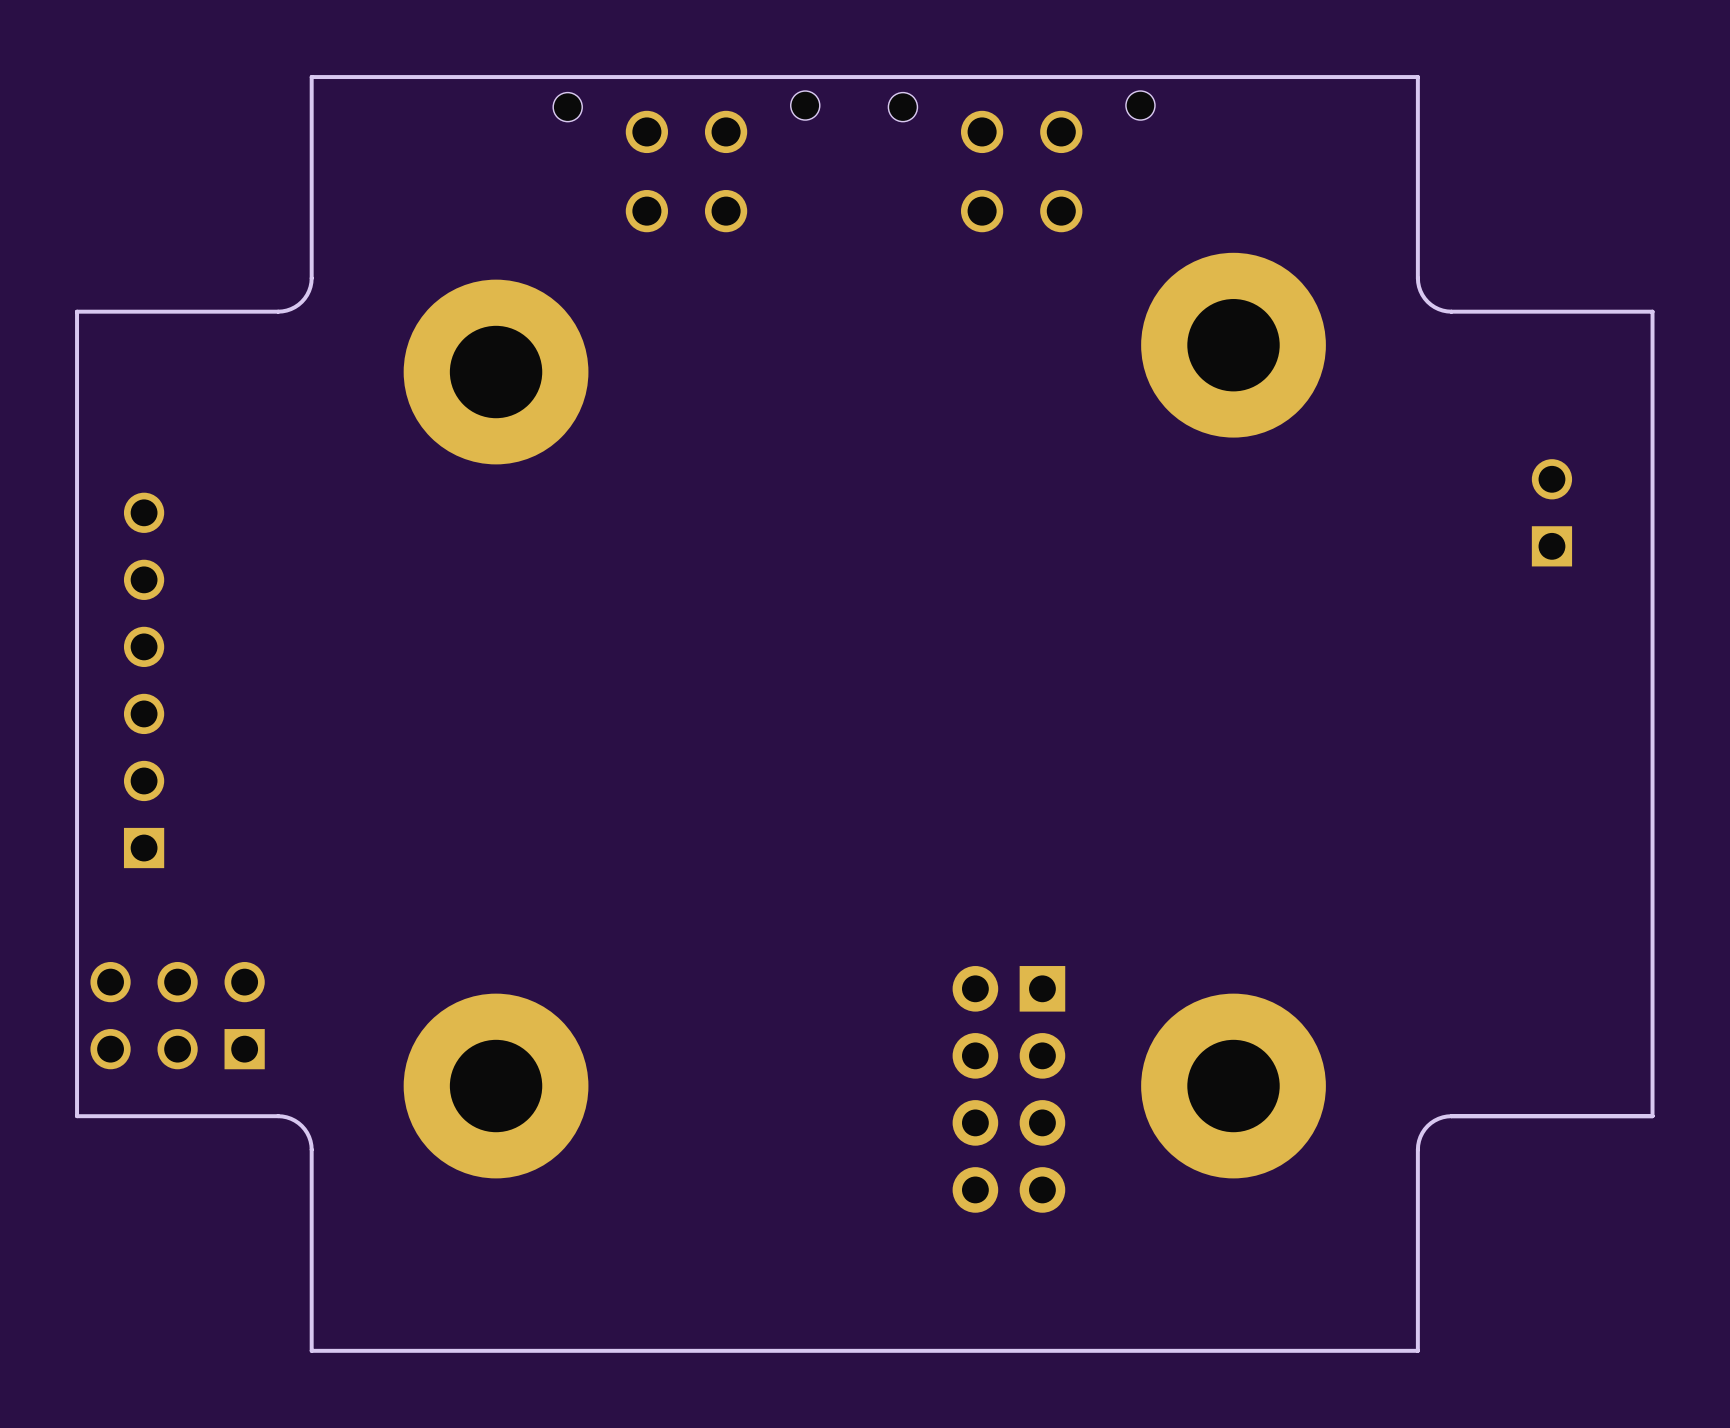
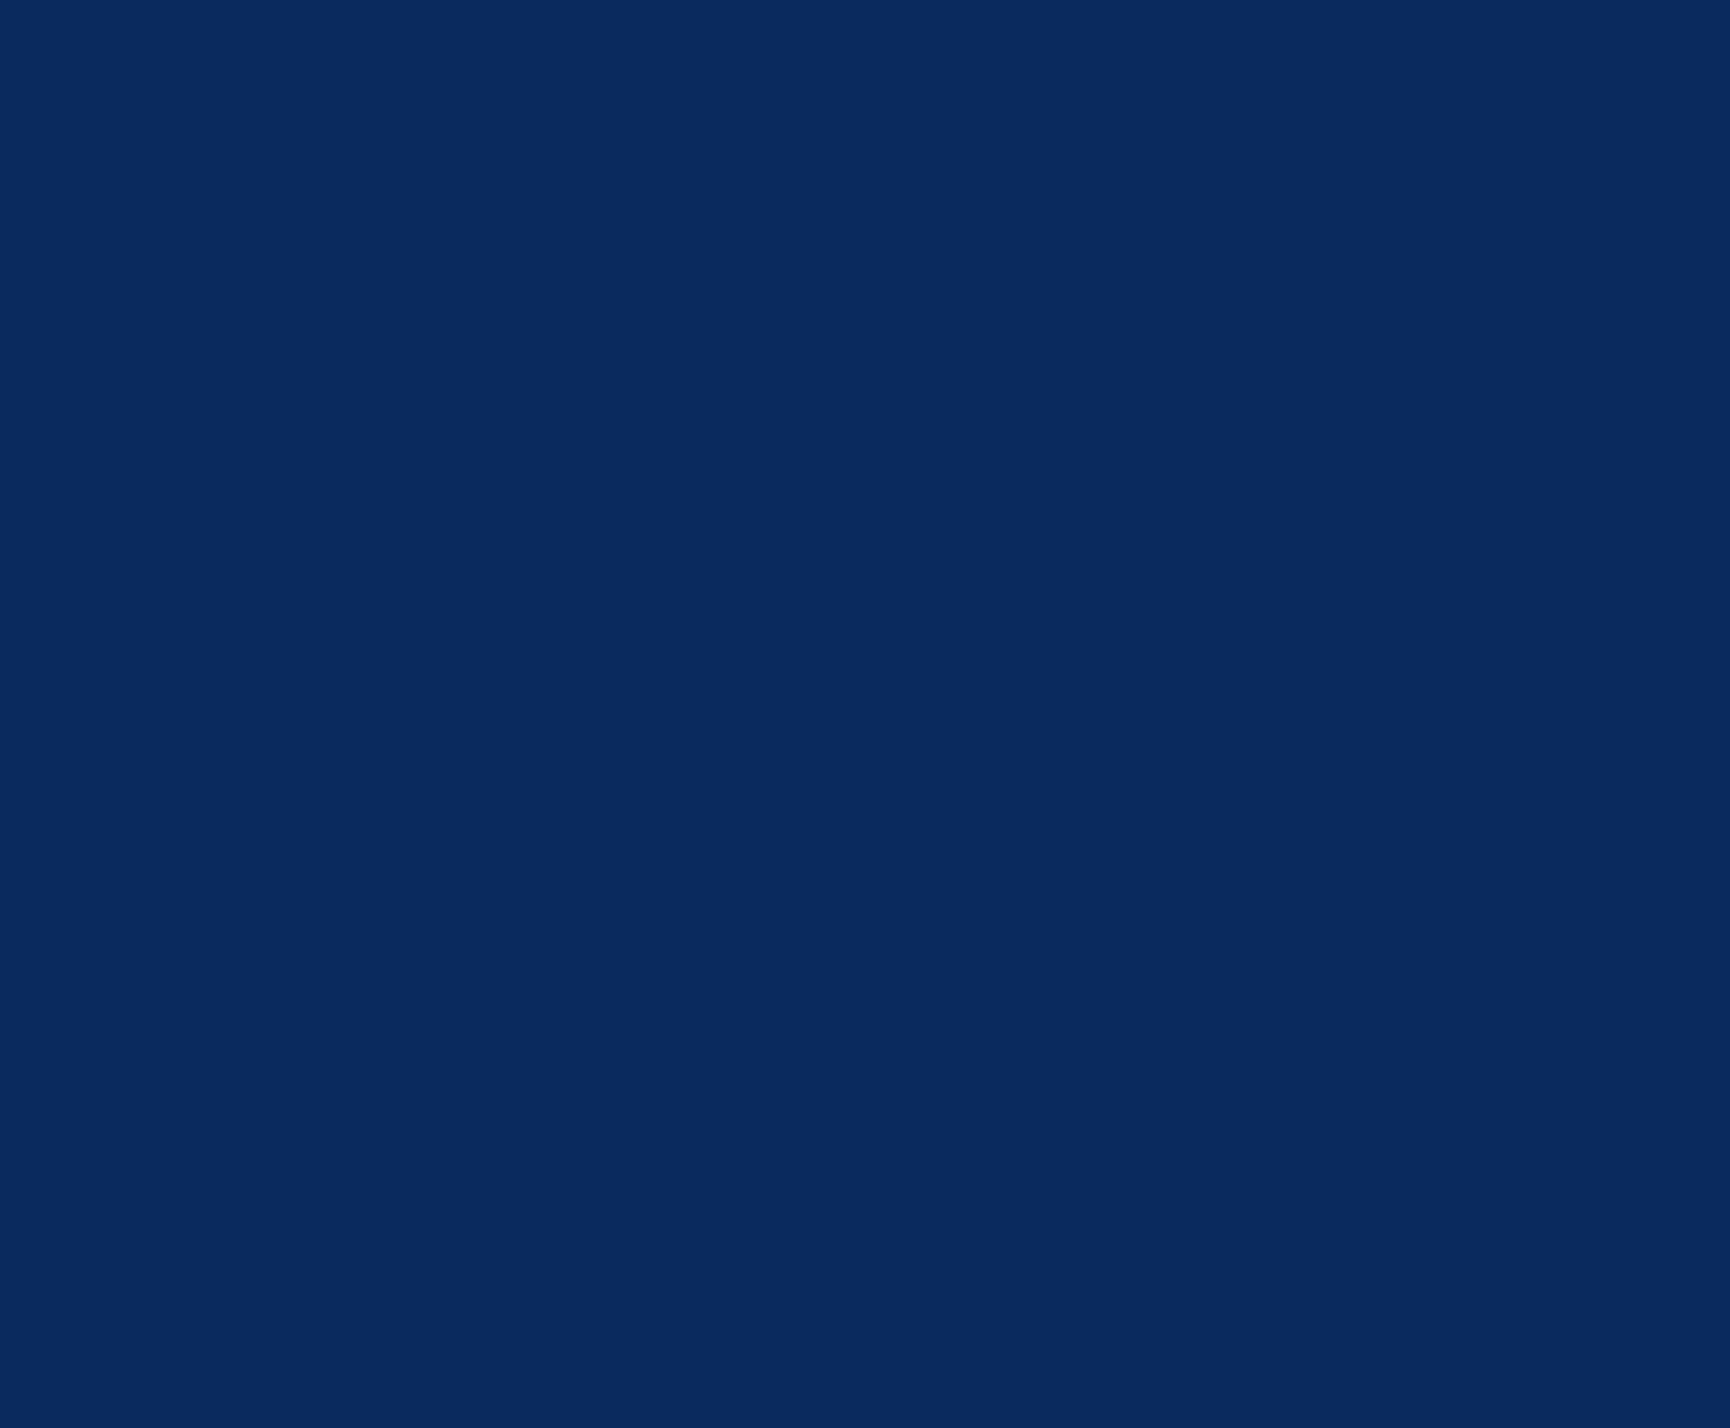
board edge: (1417, 77) (1417, 278) (1420, 290) (1427, 301) (1438, 309) (1451, 311) (1652, 311) (1652, 1116) (1451, 1116) (1438, 1118) (1427, 1126) (1420, 1136) (1417, 1149) (1417, 1350) (311, 1350) (311, 1149) (309, 1136) (301, 1126) (290, 1118) (278, 1116) (77, 1116) (77, 311) (278, 311) (290, 309) (301, 301) (309, 290) (311, 278) (311, 77) (1417, 77) -> none
part: (686, 161) -> none
part: (1021, 161) -> none
part: (1233, 345) -> none
part: (496, 372) -> none
part: (1551, 512) -> none
part: (144, 680) -> none
part: (177, 1015) -> none
part: (496, 1086) -> none
part: (1233, 1086) -> none
part: (1008, 1089) -> none

